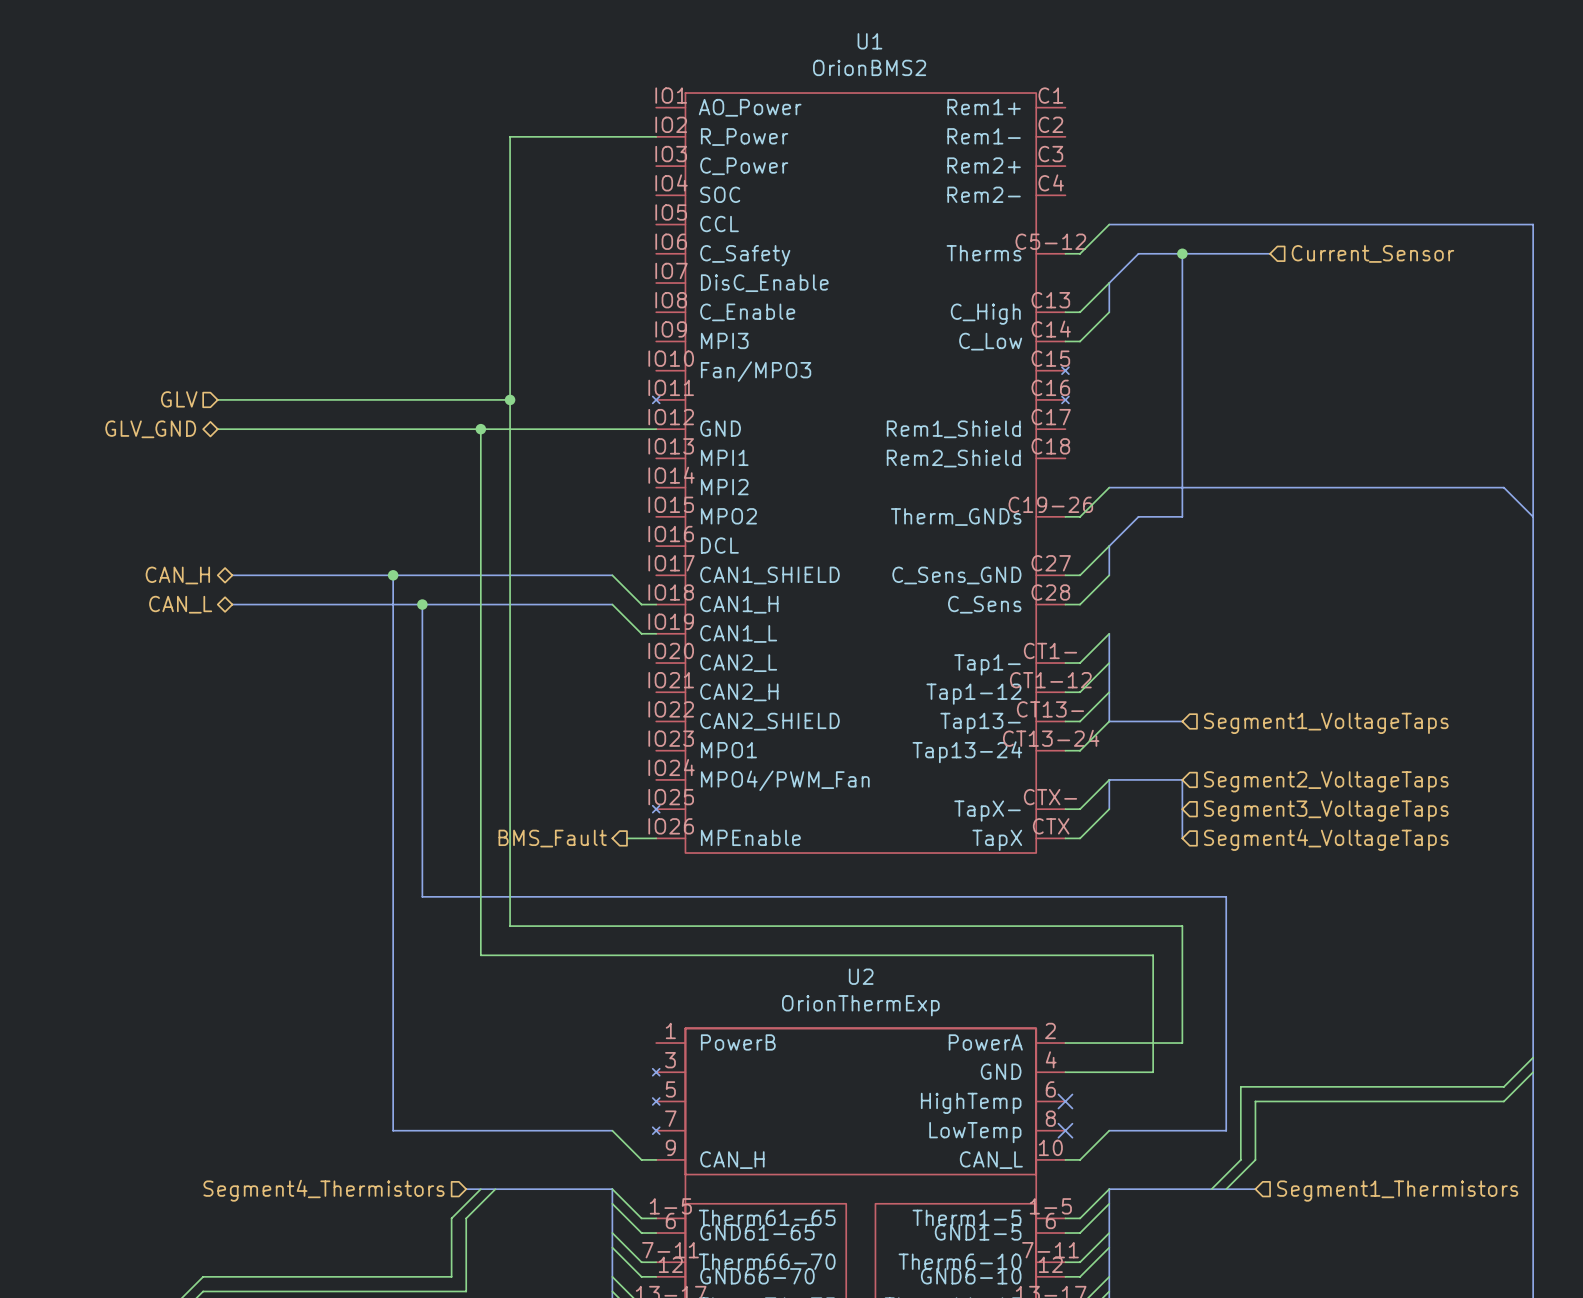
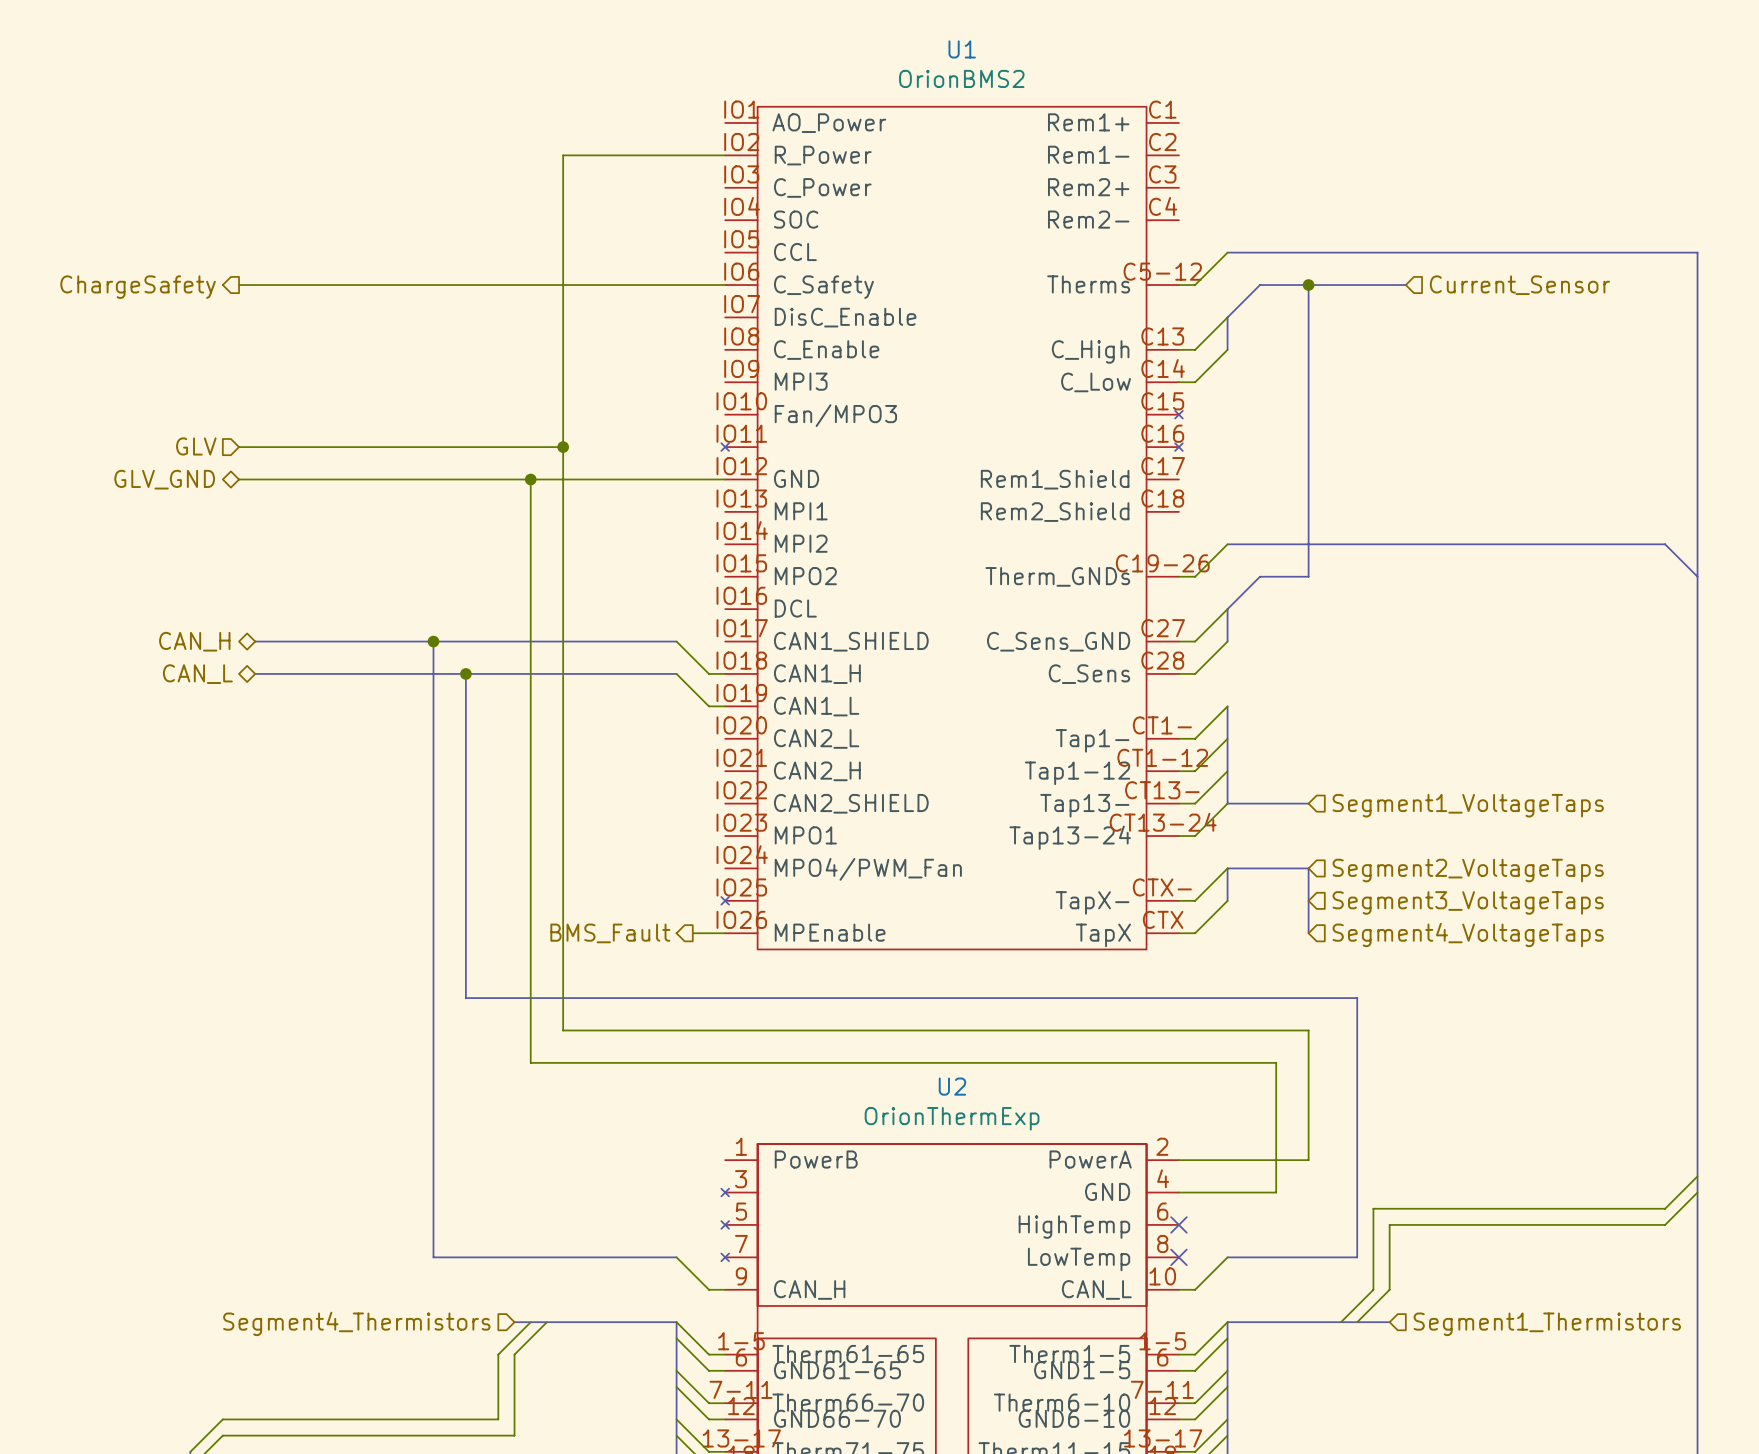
wire: none -> (239, 285) (725, 285)
hierarchical label: none -> ChargeSafety (138, 287)

